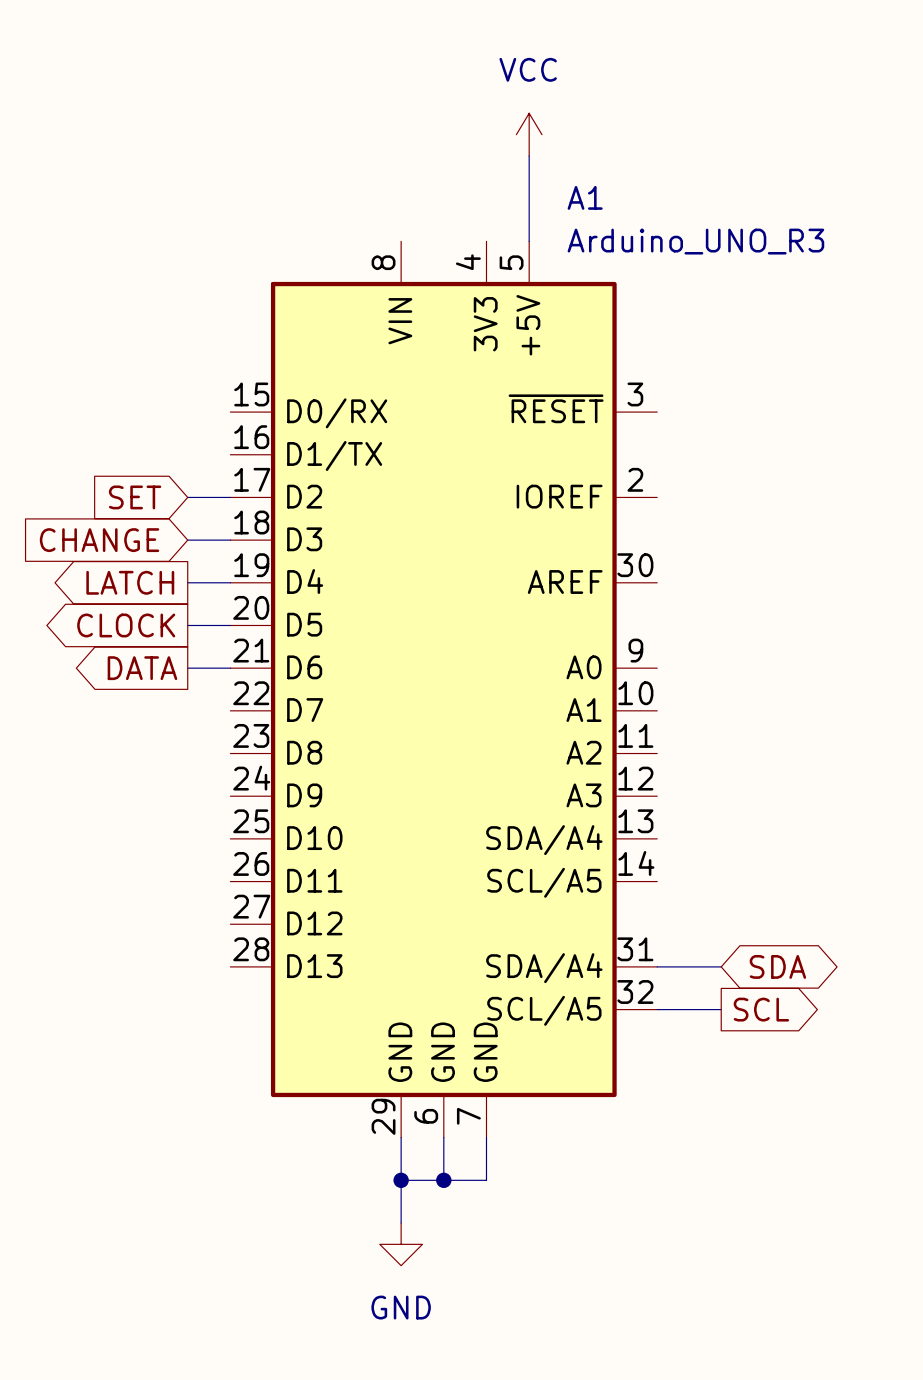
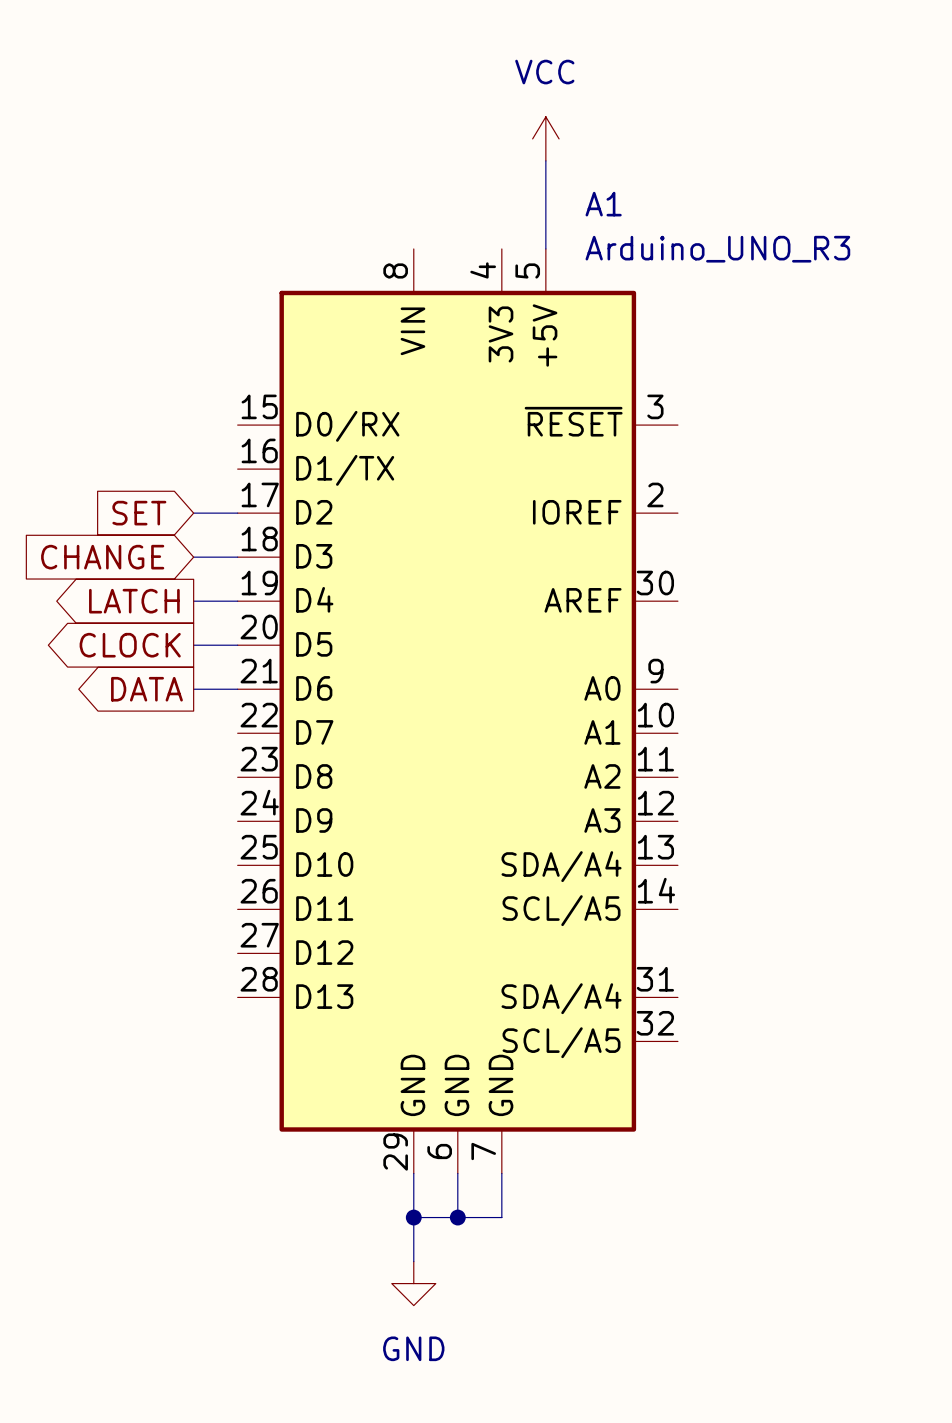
wire: (657, 966) (721, 966) -> none
global label: SDA (777, 966) -> none
wire: (657, 1009) (721, 1009) -> none
global label: SCL (761, 1009) -> none

